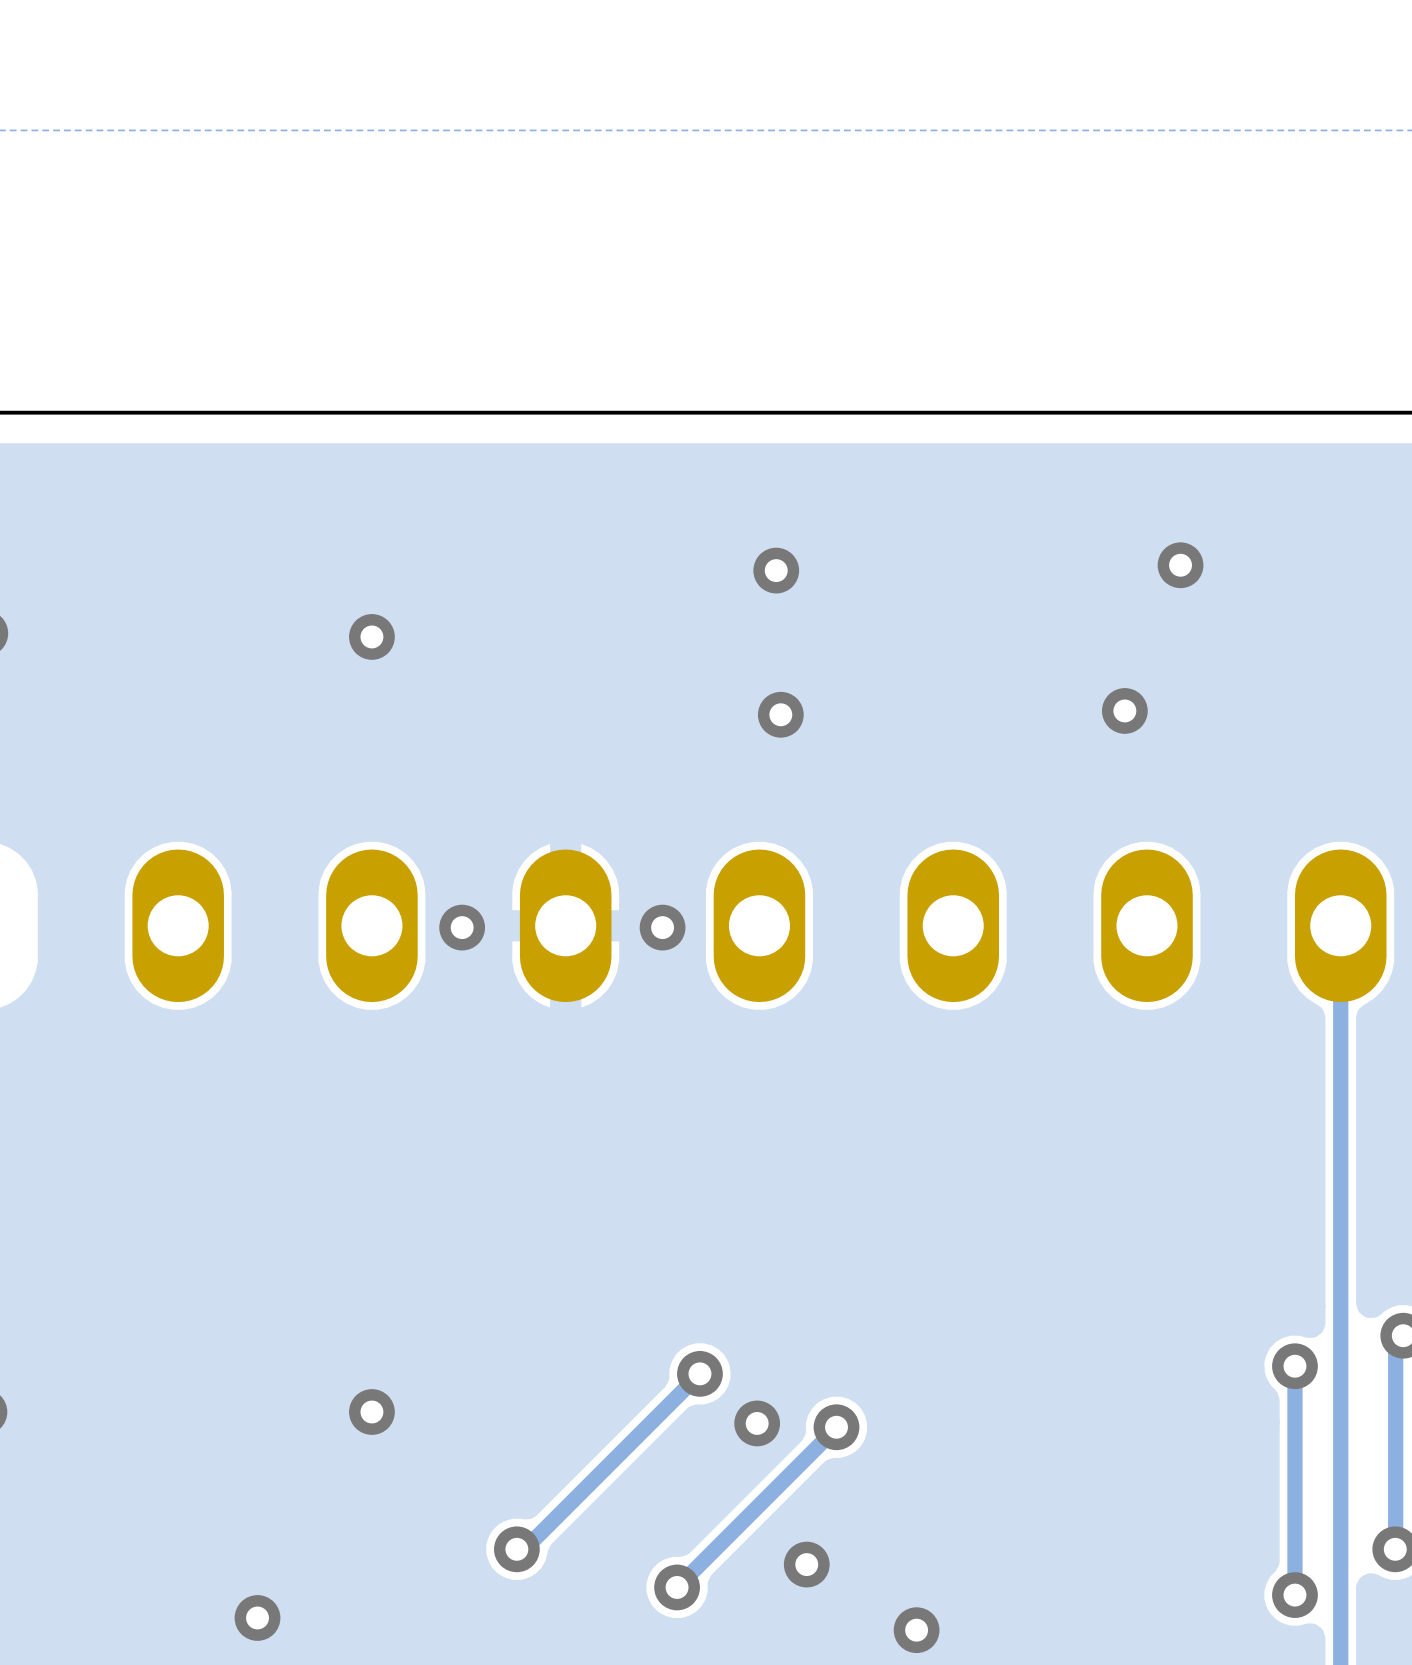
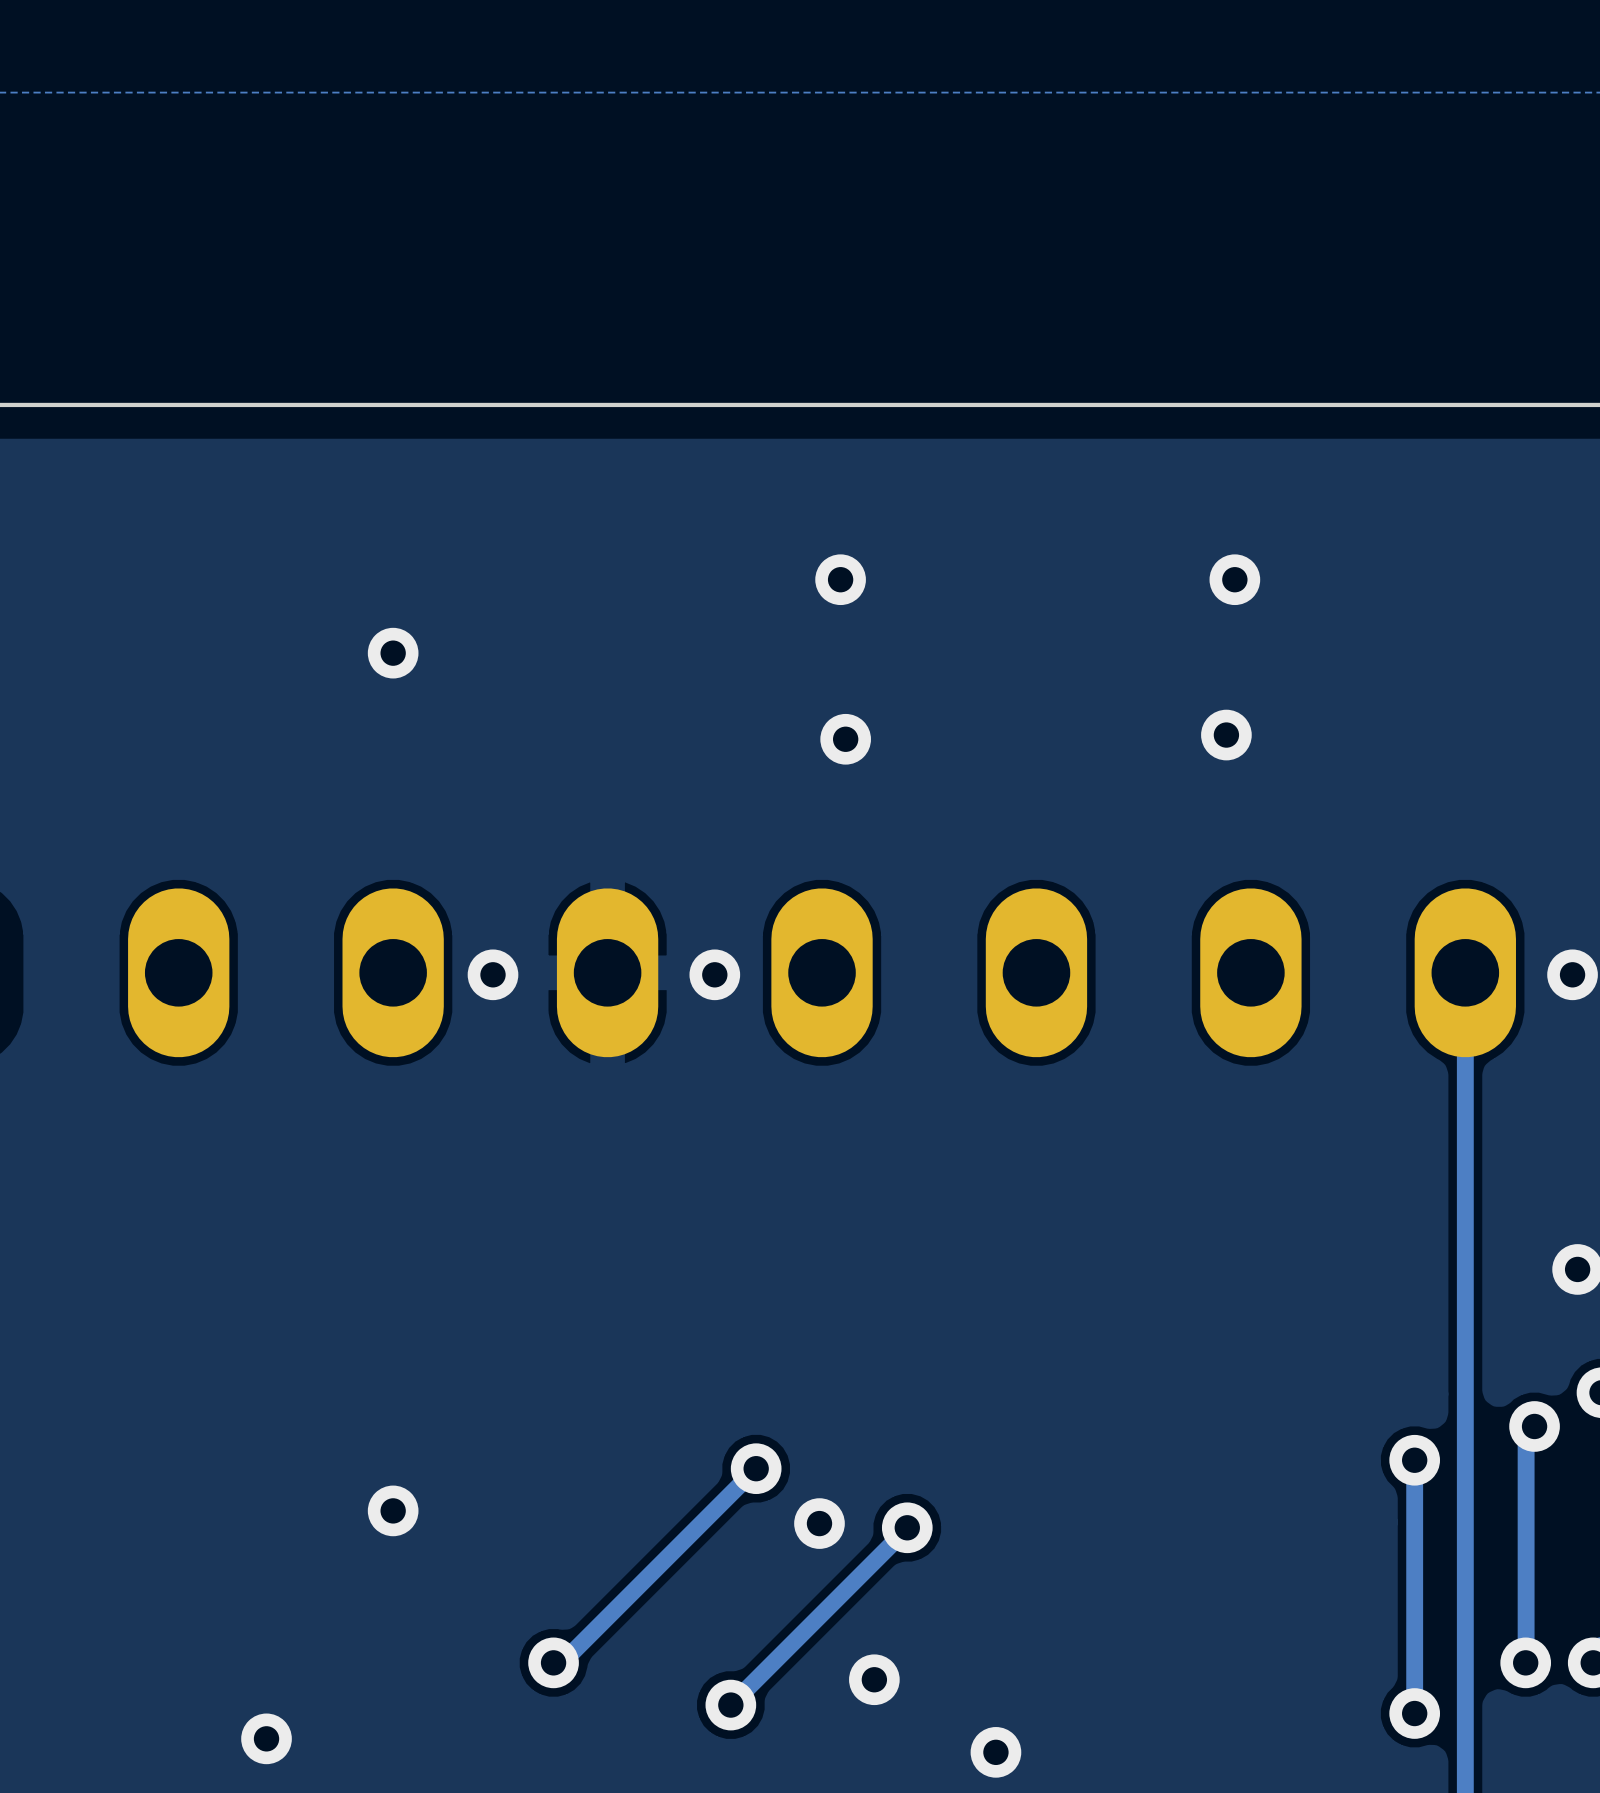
via position: (1180, 565) -> (1234, 579)

